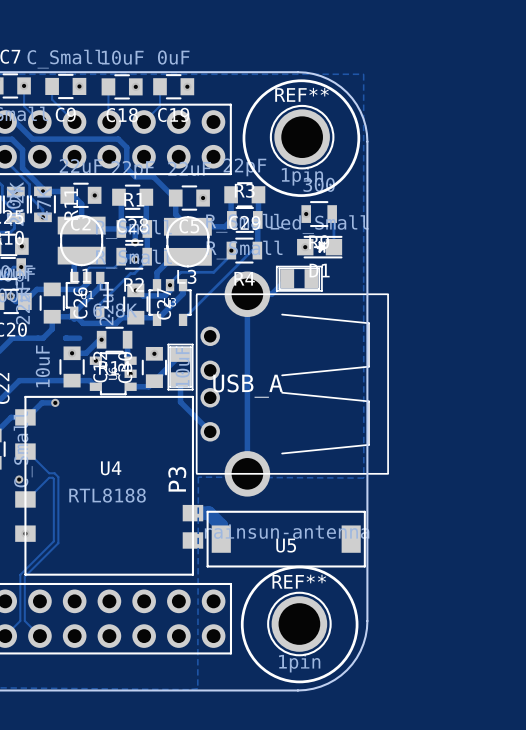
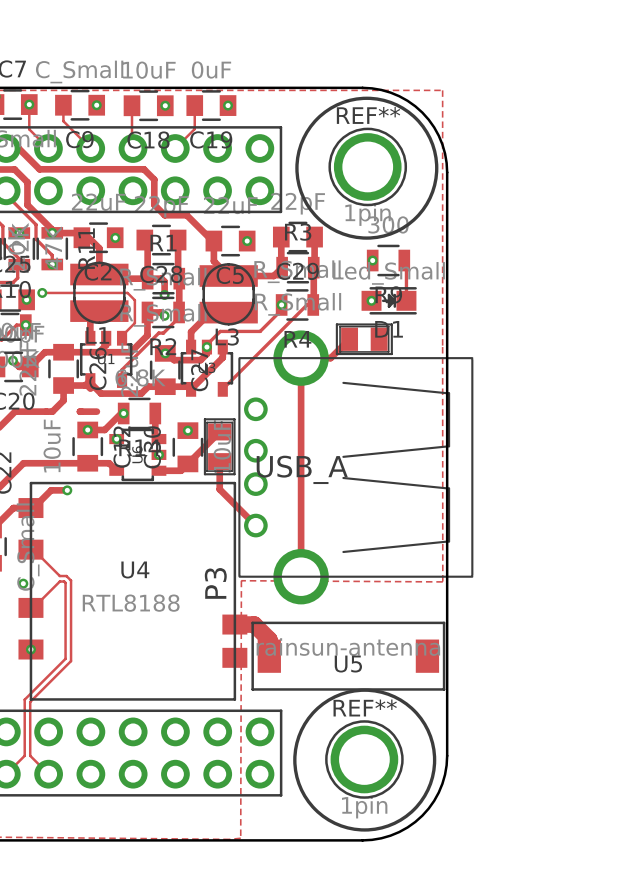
via: none -> (42, 292)
track: none -> (147, 312) (147, 335) (130, 352) (99, 352)
track: (121, 260) (114, 267) (89, 267) (87, 269) (87, 277) -> none
track: (100, 277) (100, 286) (74, 312) -> (122, 338) (122, 335) (134, 323) (134, 300) (127, 292) (42, 292)

